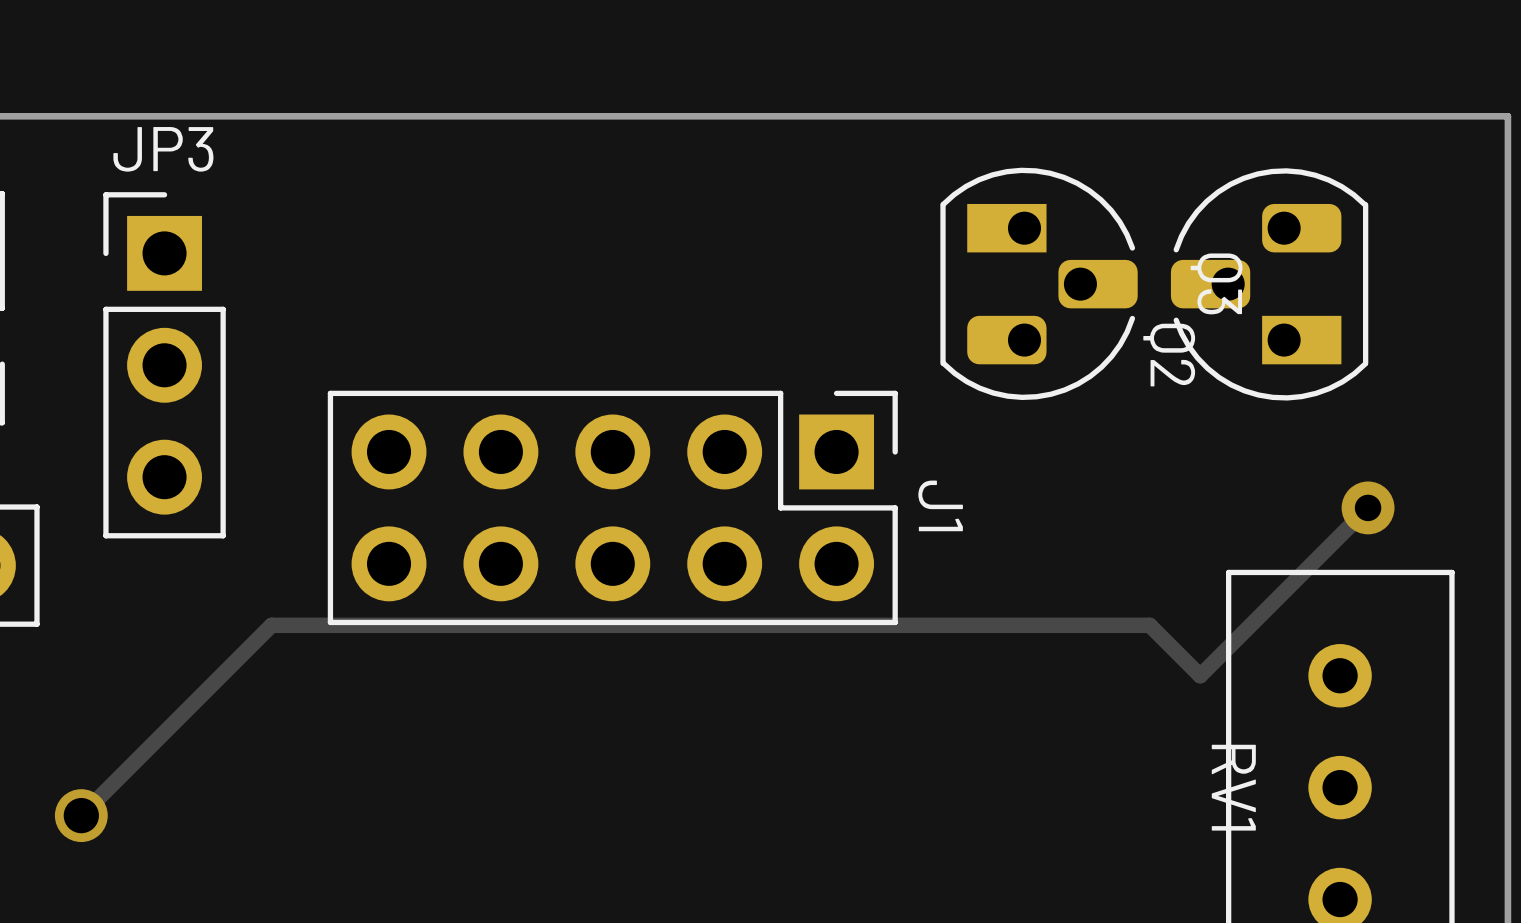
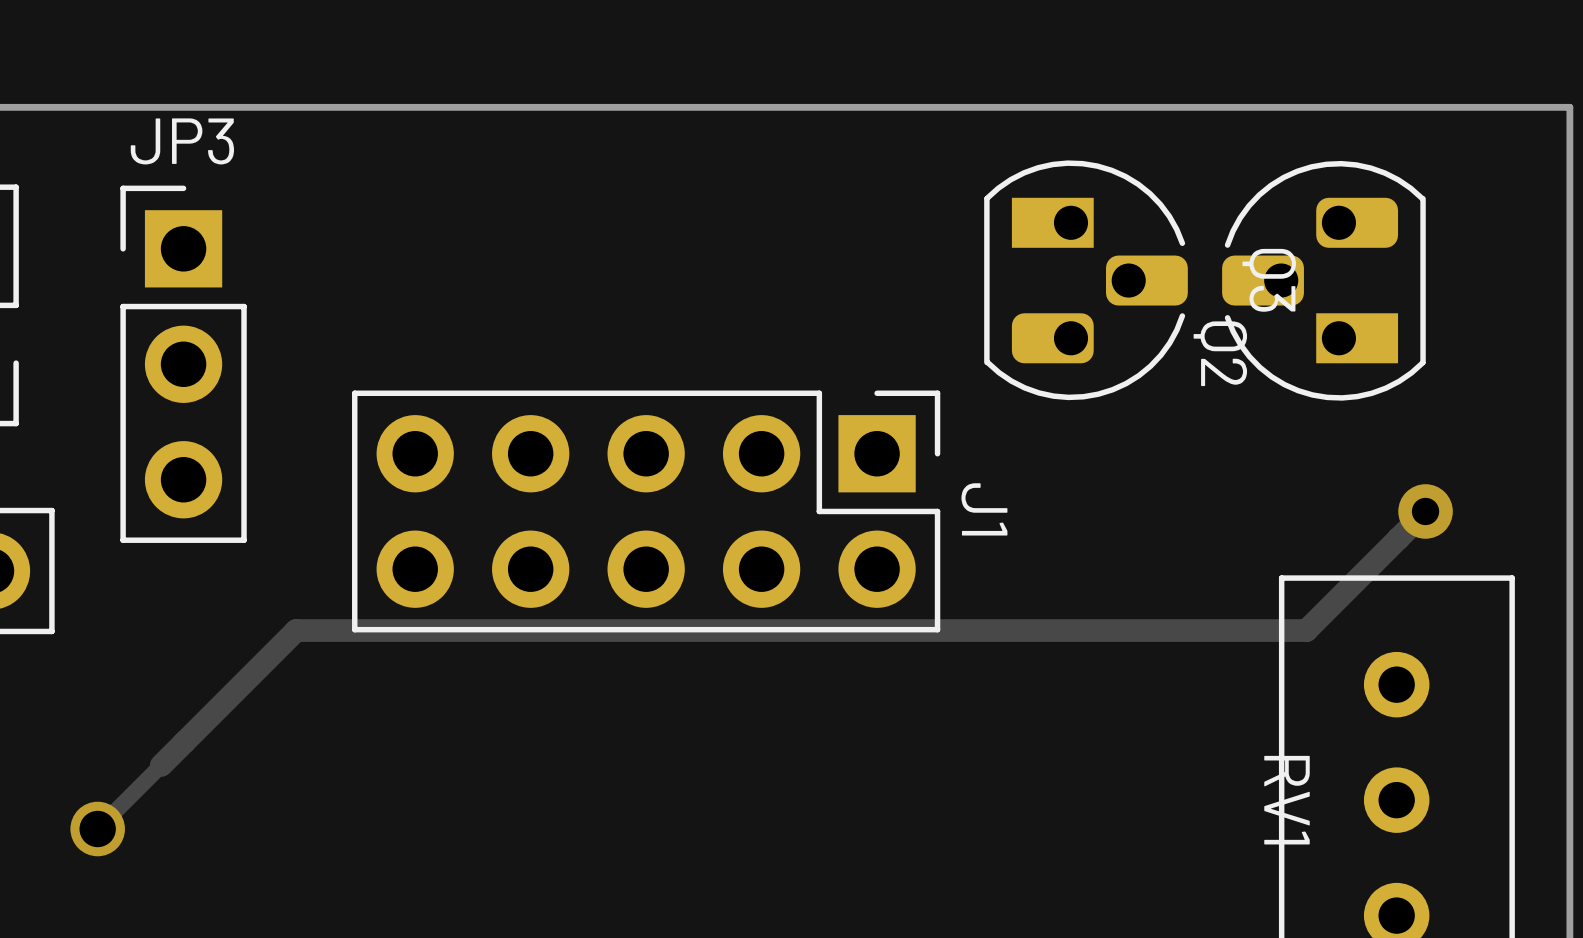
track width: thin (1368, 507) (1252, 623) -> thick (1425, 511) (1306, 630)
track: (1252, 623) (1200, 675) (1149, 625) (271, 625) -> (1306, 630) (296, 630) (294, 632)
track width: thin (271, 625) (142, 754) -> thick (294, 632) (161, 765)

